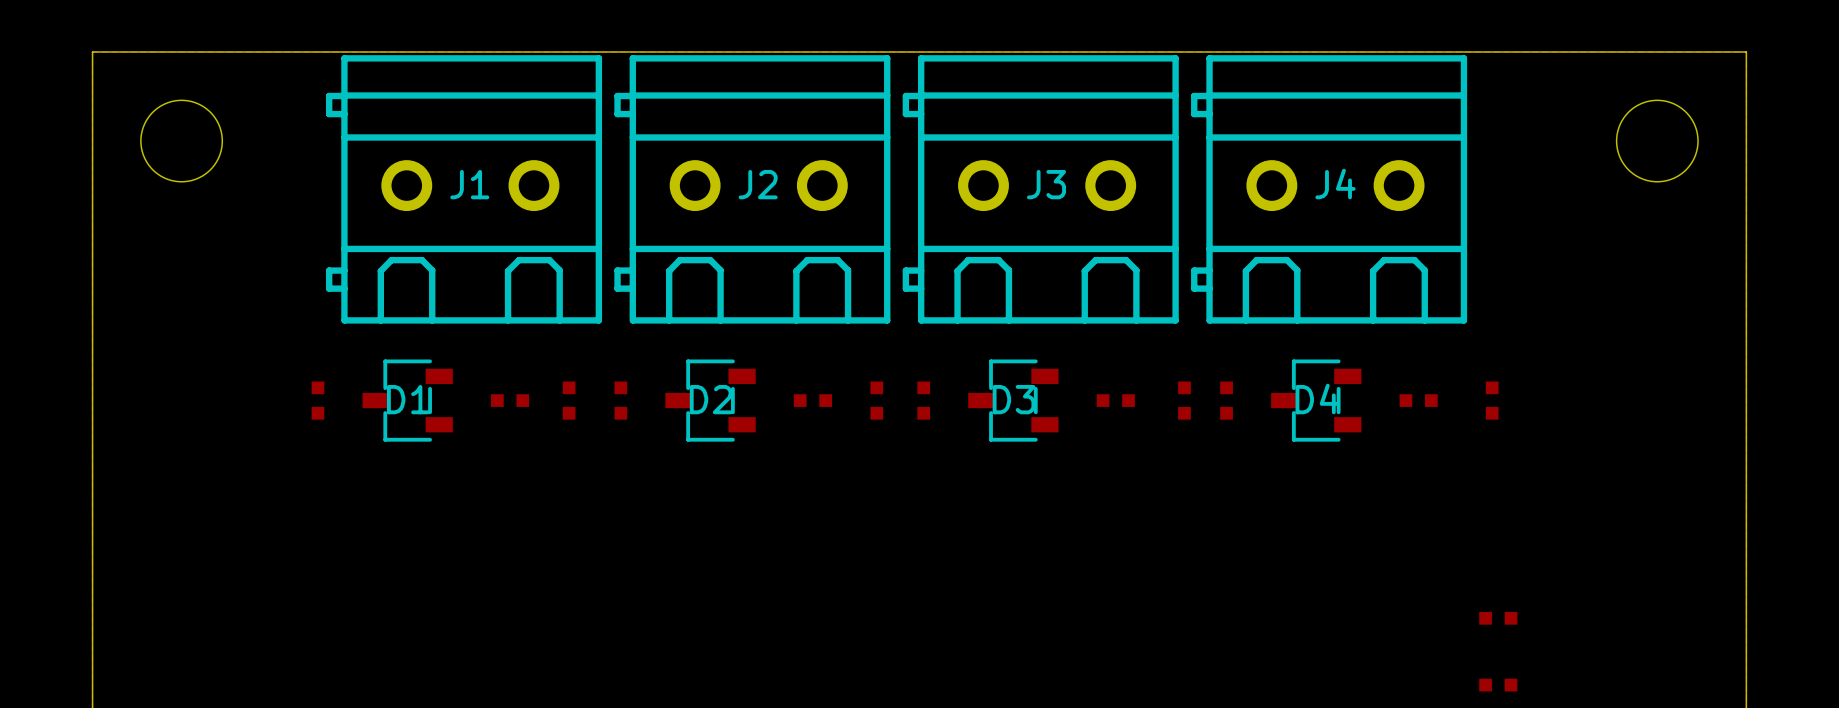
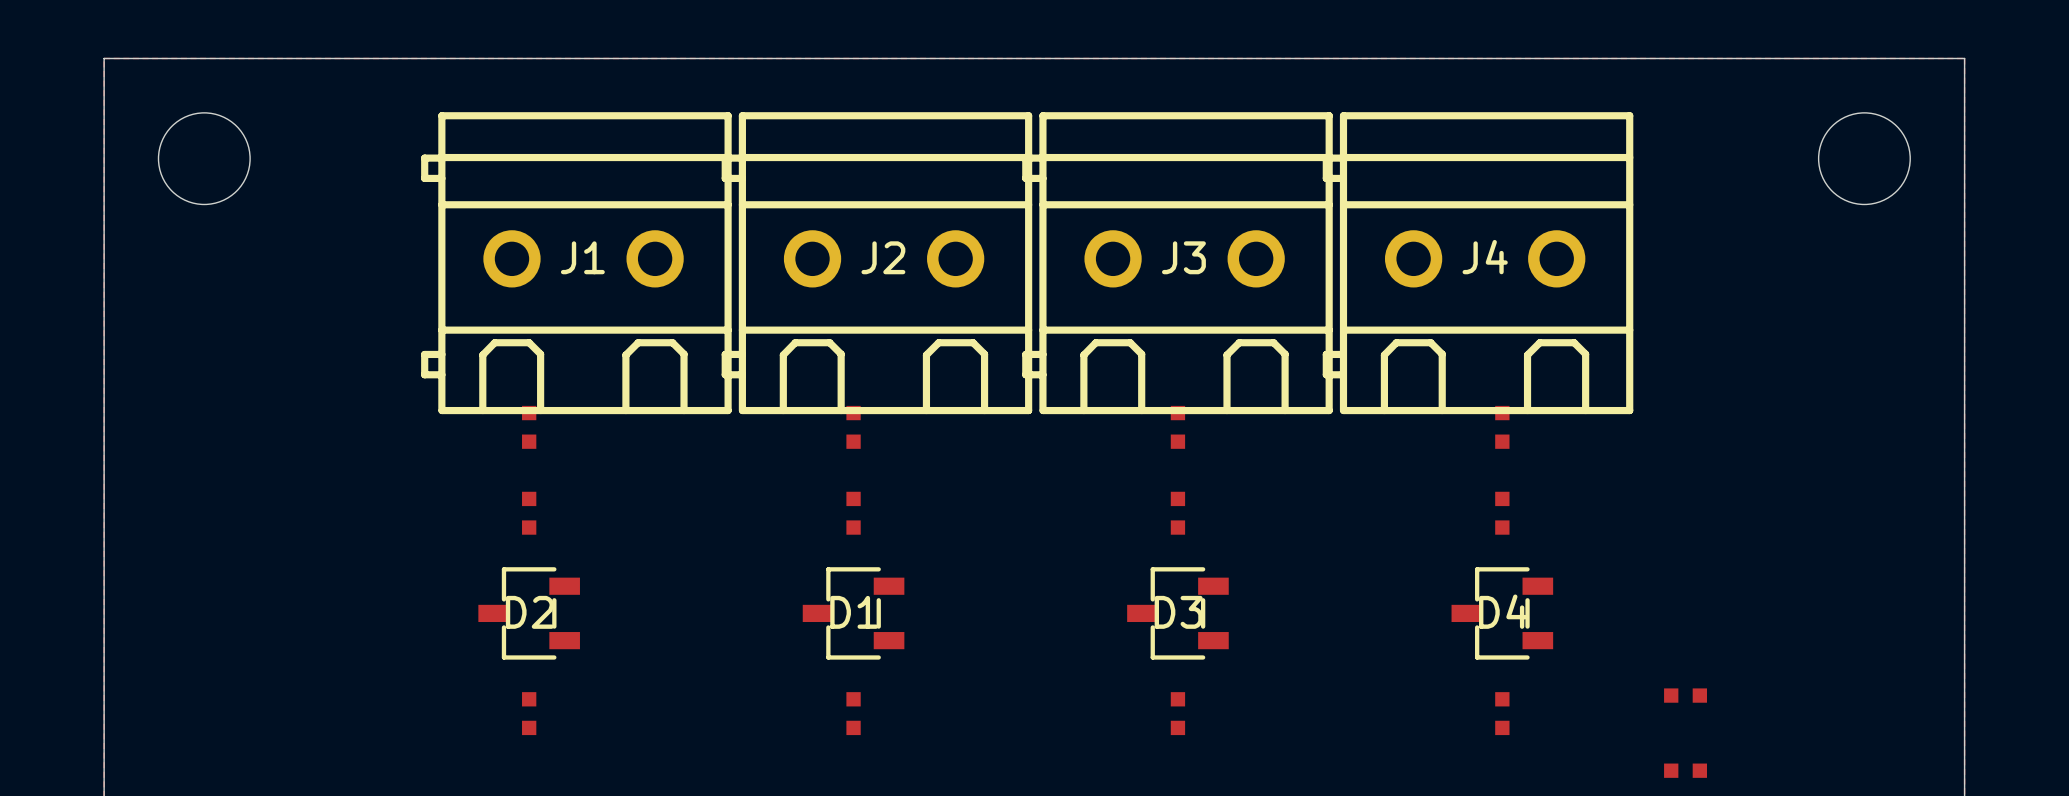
J1 position: (464, 189) -> (576, 263)
J2 position: (752, 189) -> (876, 263)
J3 position: (1040, 189) -> (1177, 263)
J4 position: (1329, 189) -> (1478, 263)
part: none -> (529, 427)
part: none -> (853, 427)
part: none -> (1177, 427)
part: none -> (1502, 427)
part: (317, 400) -> none
D1 position: (407, 400) -> (853, 613)
part: (510, 400) -> none
part: (569, 400) -> none
part: (620, 400) -> none
D2 position: (710, 400) -> (529, 613)
part: (812, 400) -> none
part: (876, 400) -> none
part: (923, 400) -> none
D3 position: (1013, 400) -> (1177, 613)
part: (1115, 400) -> none
part: (1184, 400) -> none
part: (1226, 400) -> none
D4 position: (1316, 400) -> (1502, 613)
part: (1418, 400) -> none
part: (1492, 400) -> none
part: none -> (529, 513)
part: none -> (853, 513)
part: none -> (1177, 513)
part: none -> (1502, 513)
part: none -> (529, 713)
part: none -> (853, 713)
part: none -> (1177, 713)
part: none -> (1502, 713)

